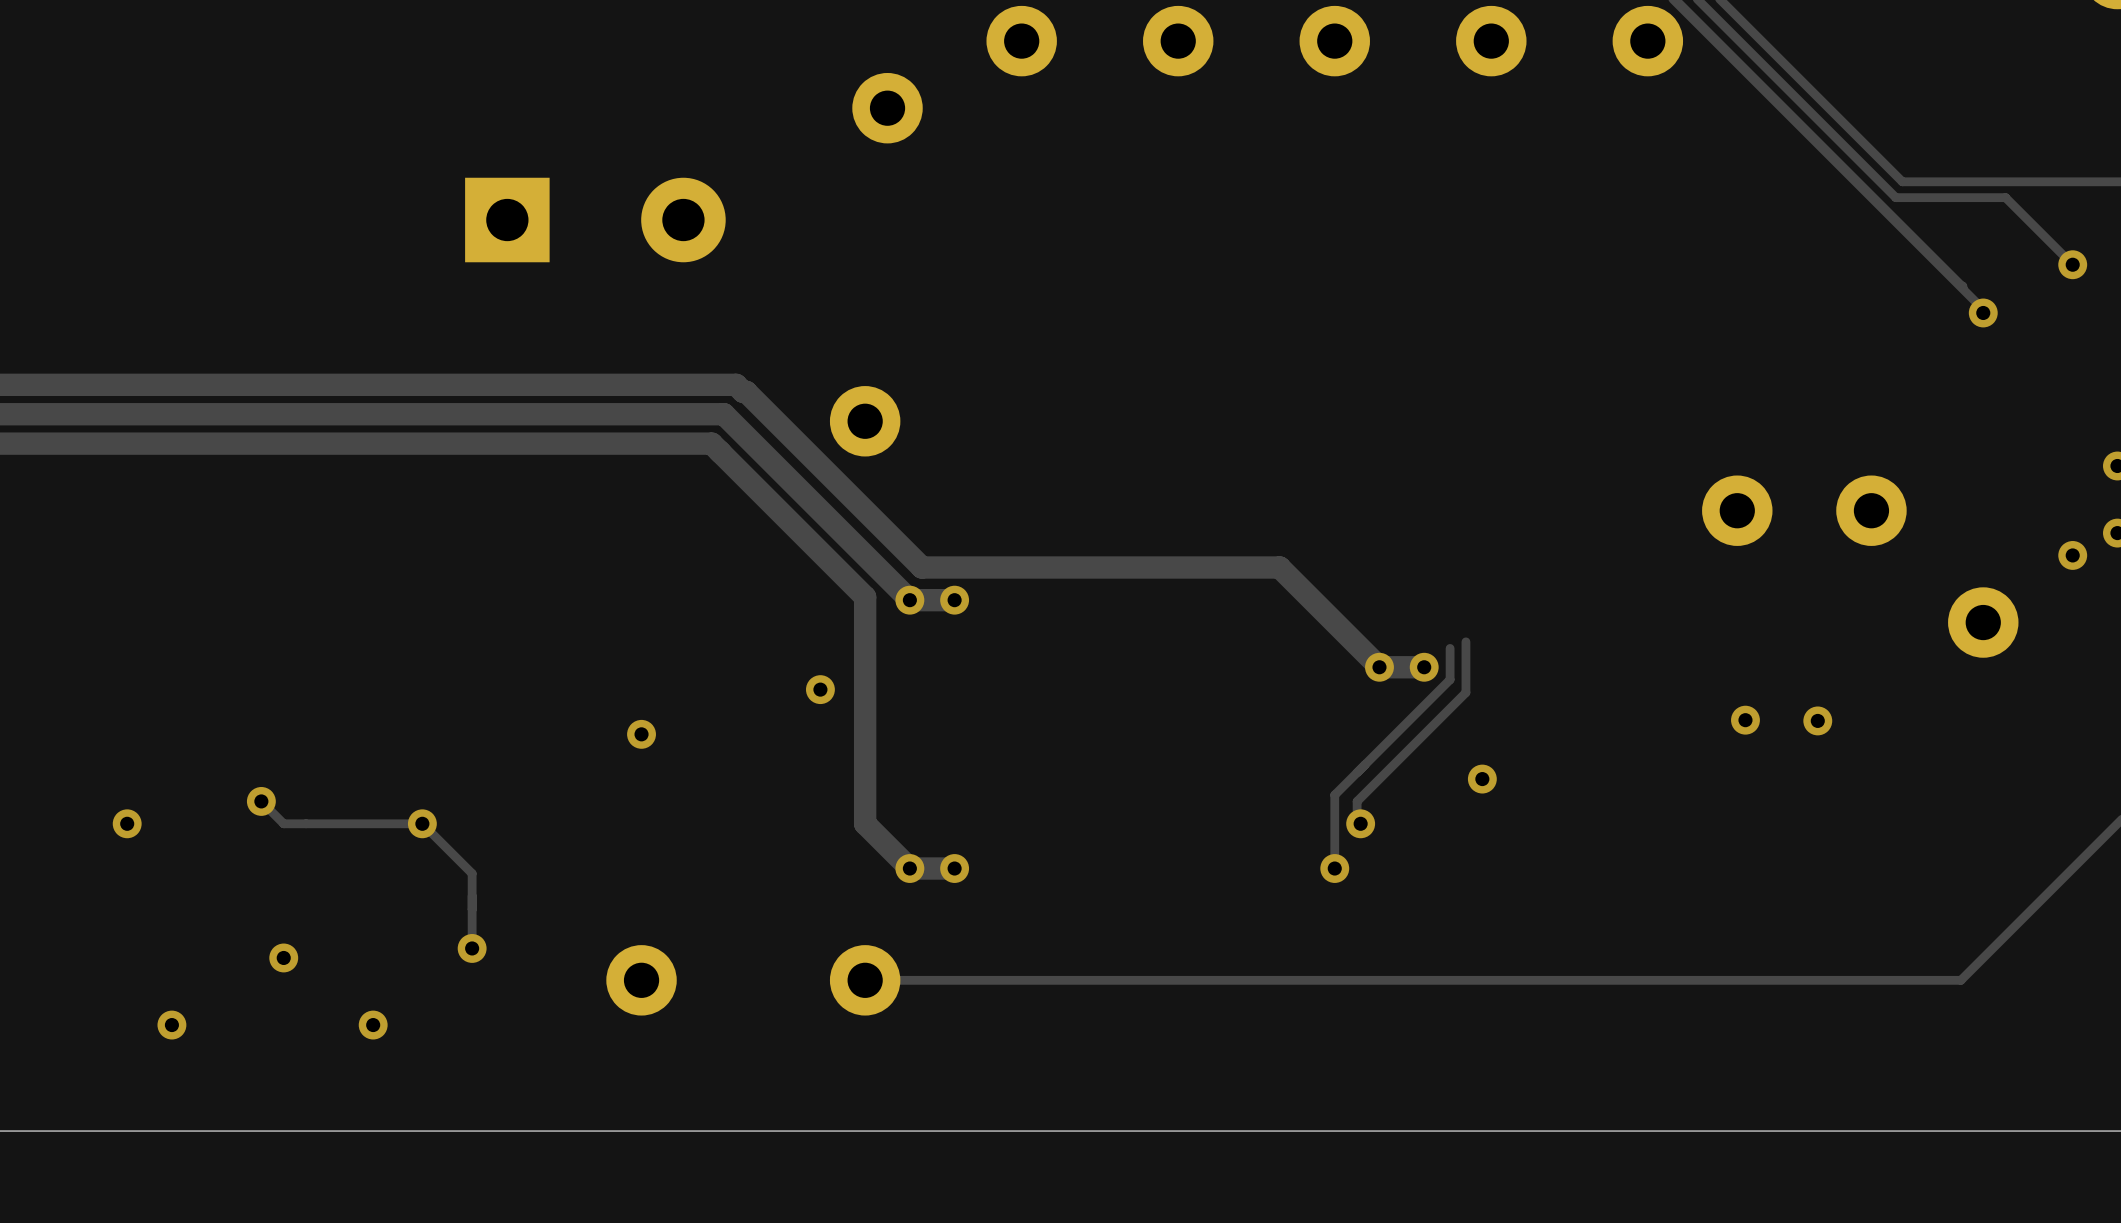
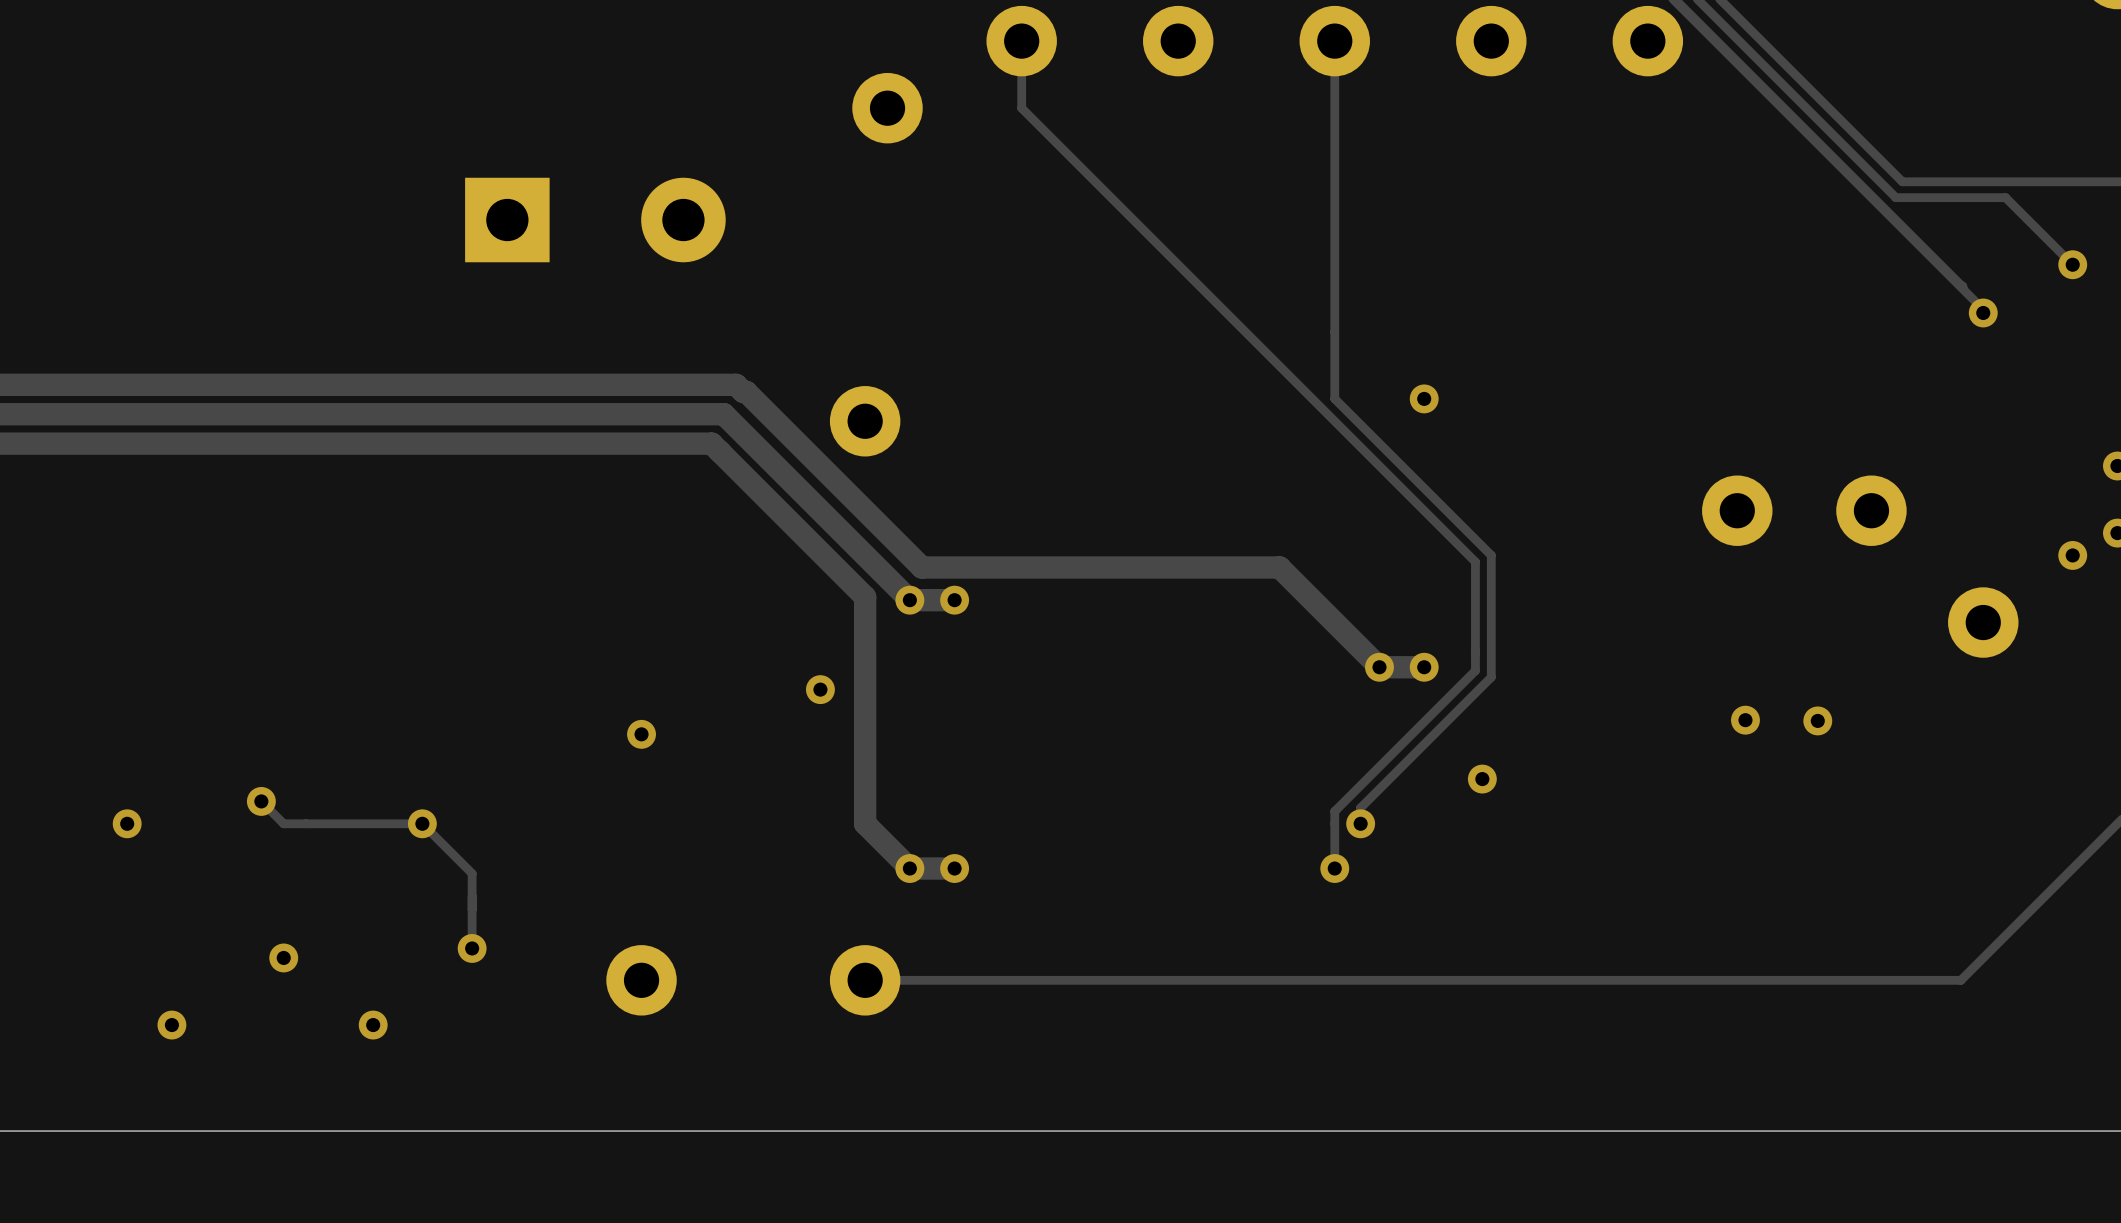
via: none -> (1424, 398)
track: (1465, 641) (1465, 692) (1357, 801) (1357, 820) (1360, 823) -> (1334, 41) (1334, 398) (1491, 555) (1491, 677) (1360, 807) (1360, 823)
track: (1450, 648) (1450, 679) (1334, 795) (1334, 823) -> (1021, 41) (1021, 108) (1475, 561) (1475, 670) (1334, 811) (1334, 823)

